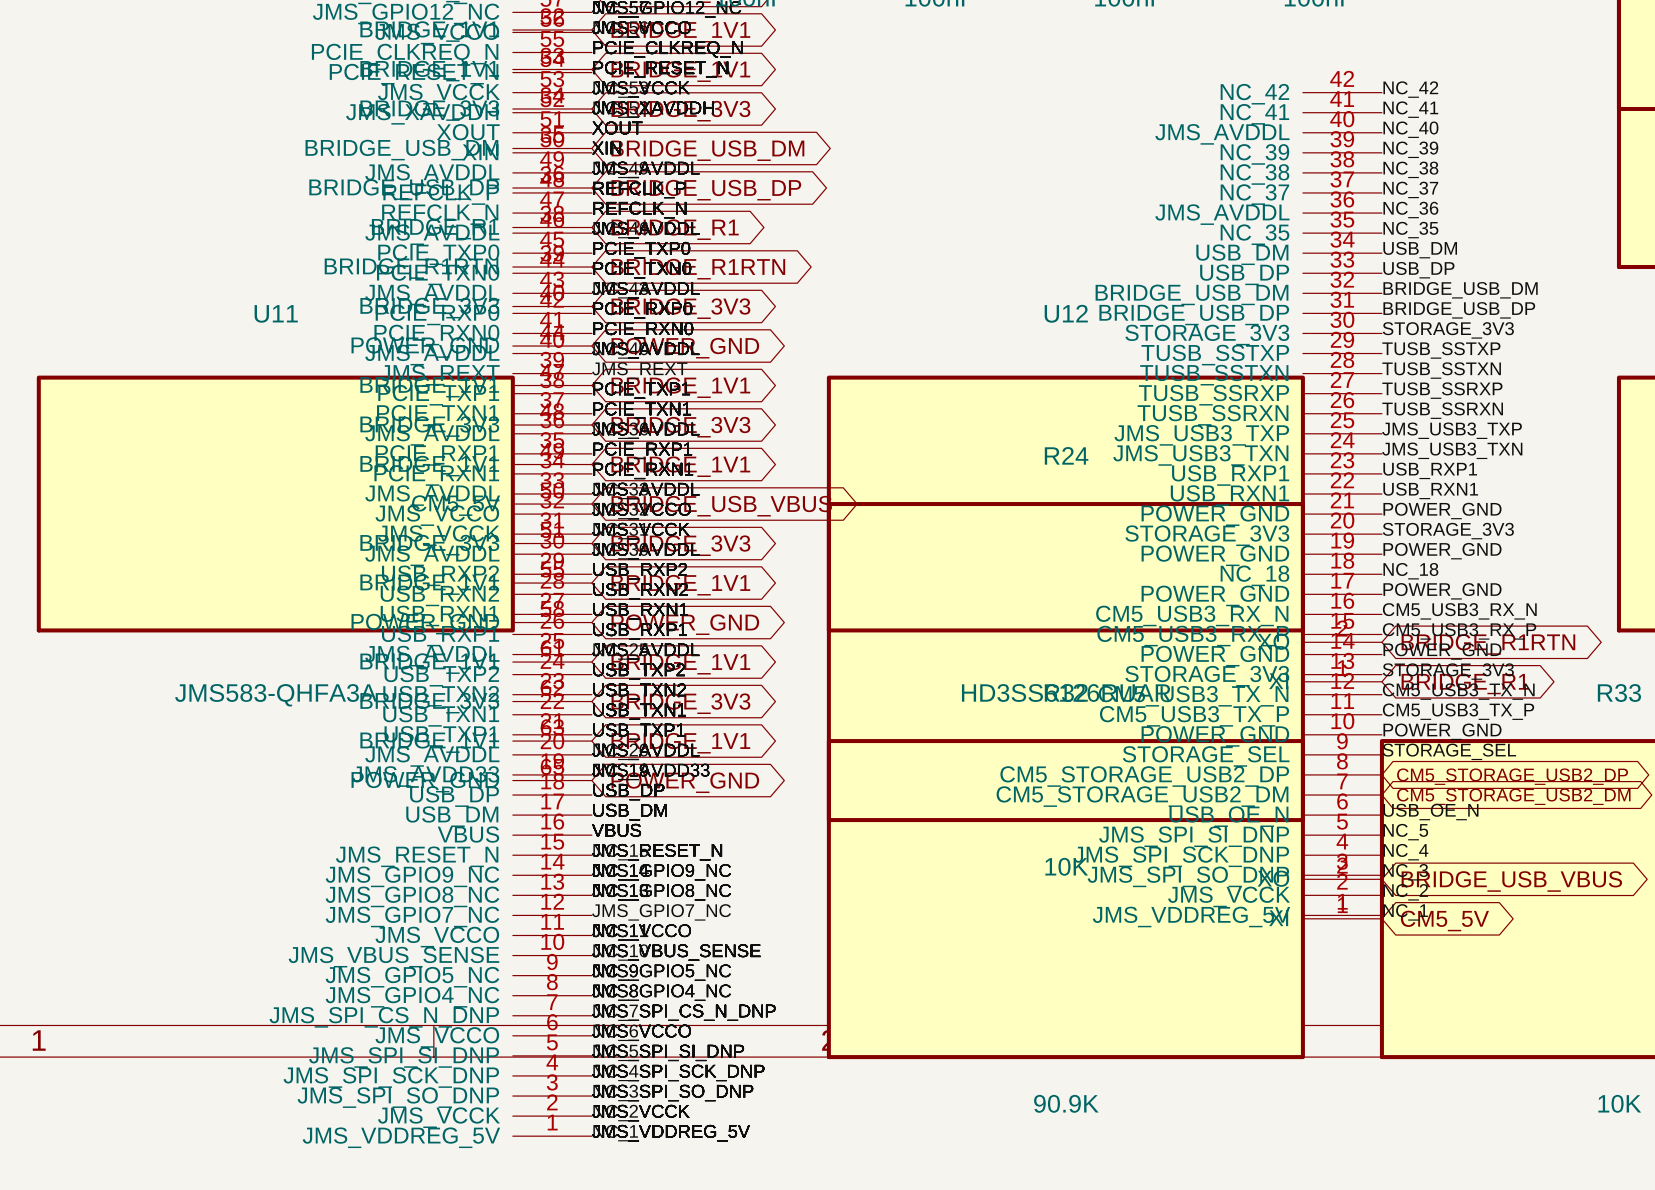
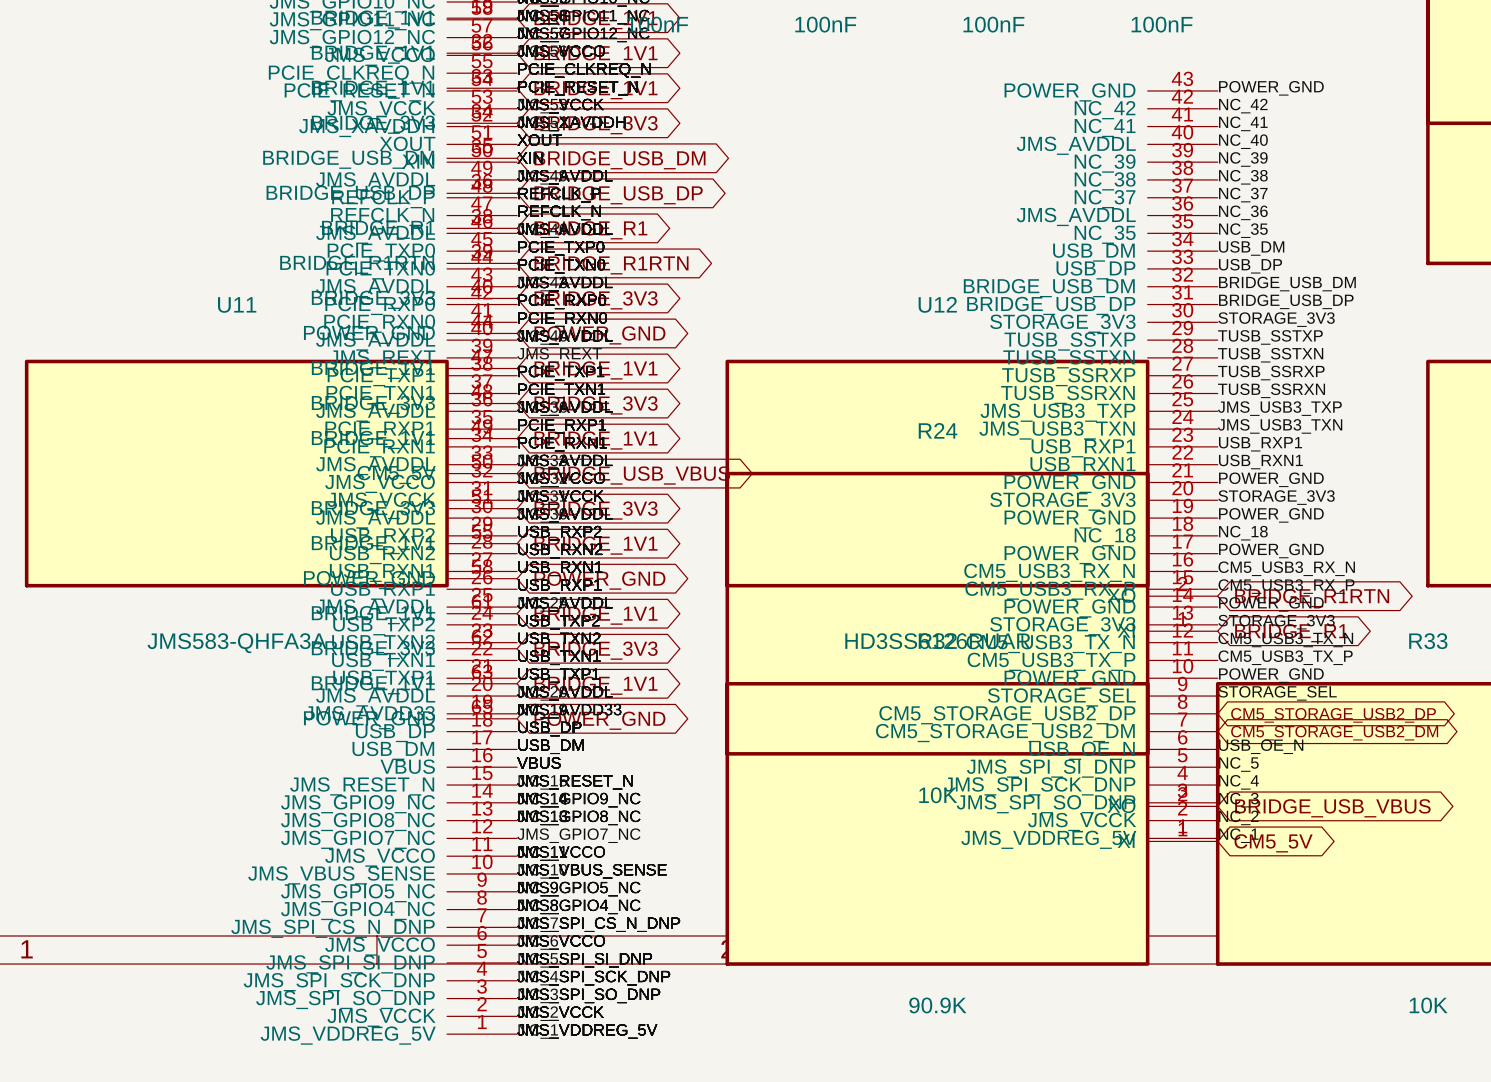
label: none -> POWER_GND (1271, 88)
U12 symbol: [826, 92, 1382, 916] -> [725, 90, 1218, 839]

